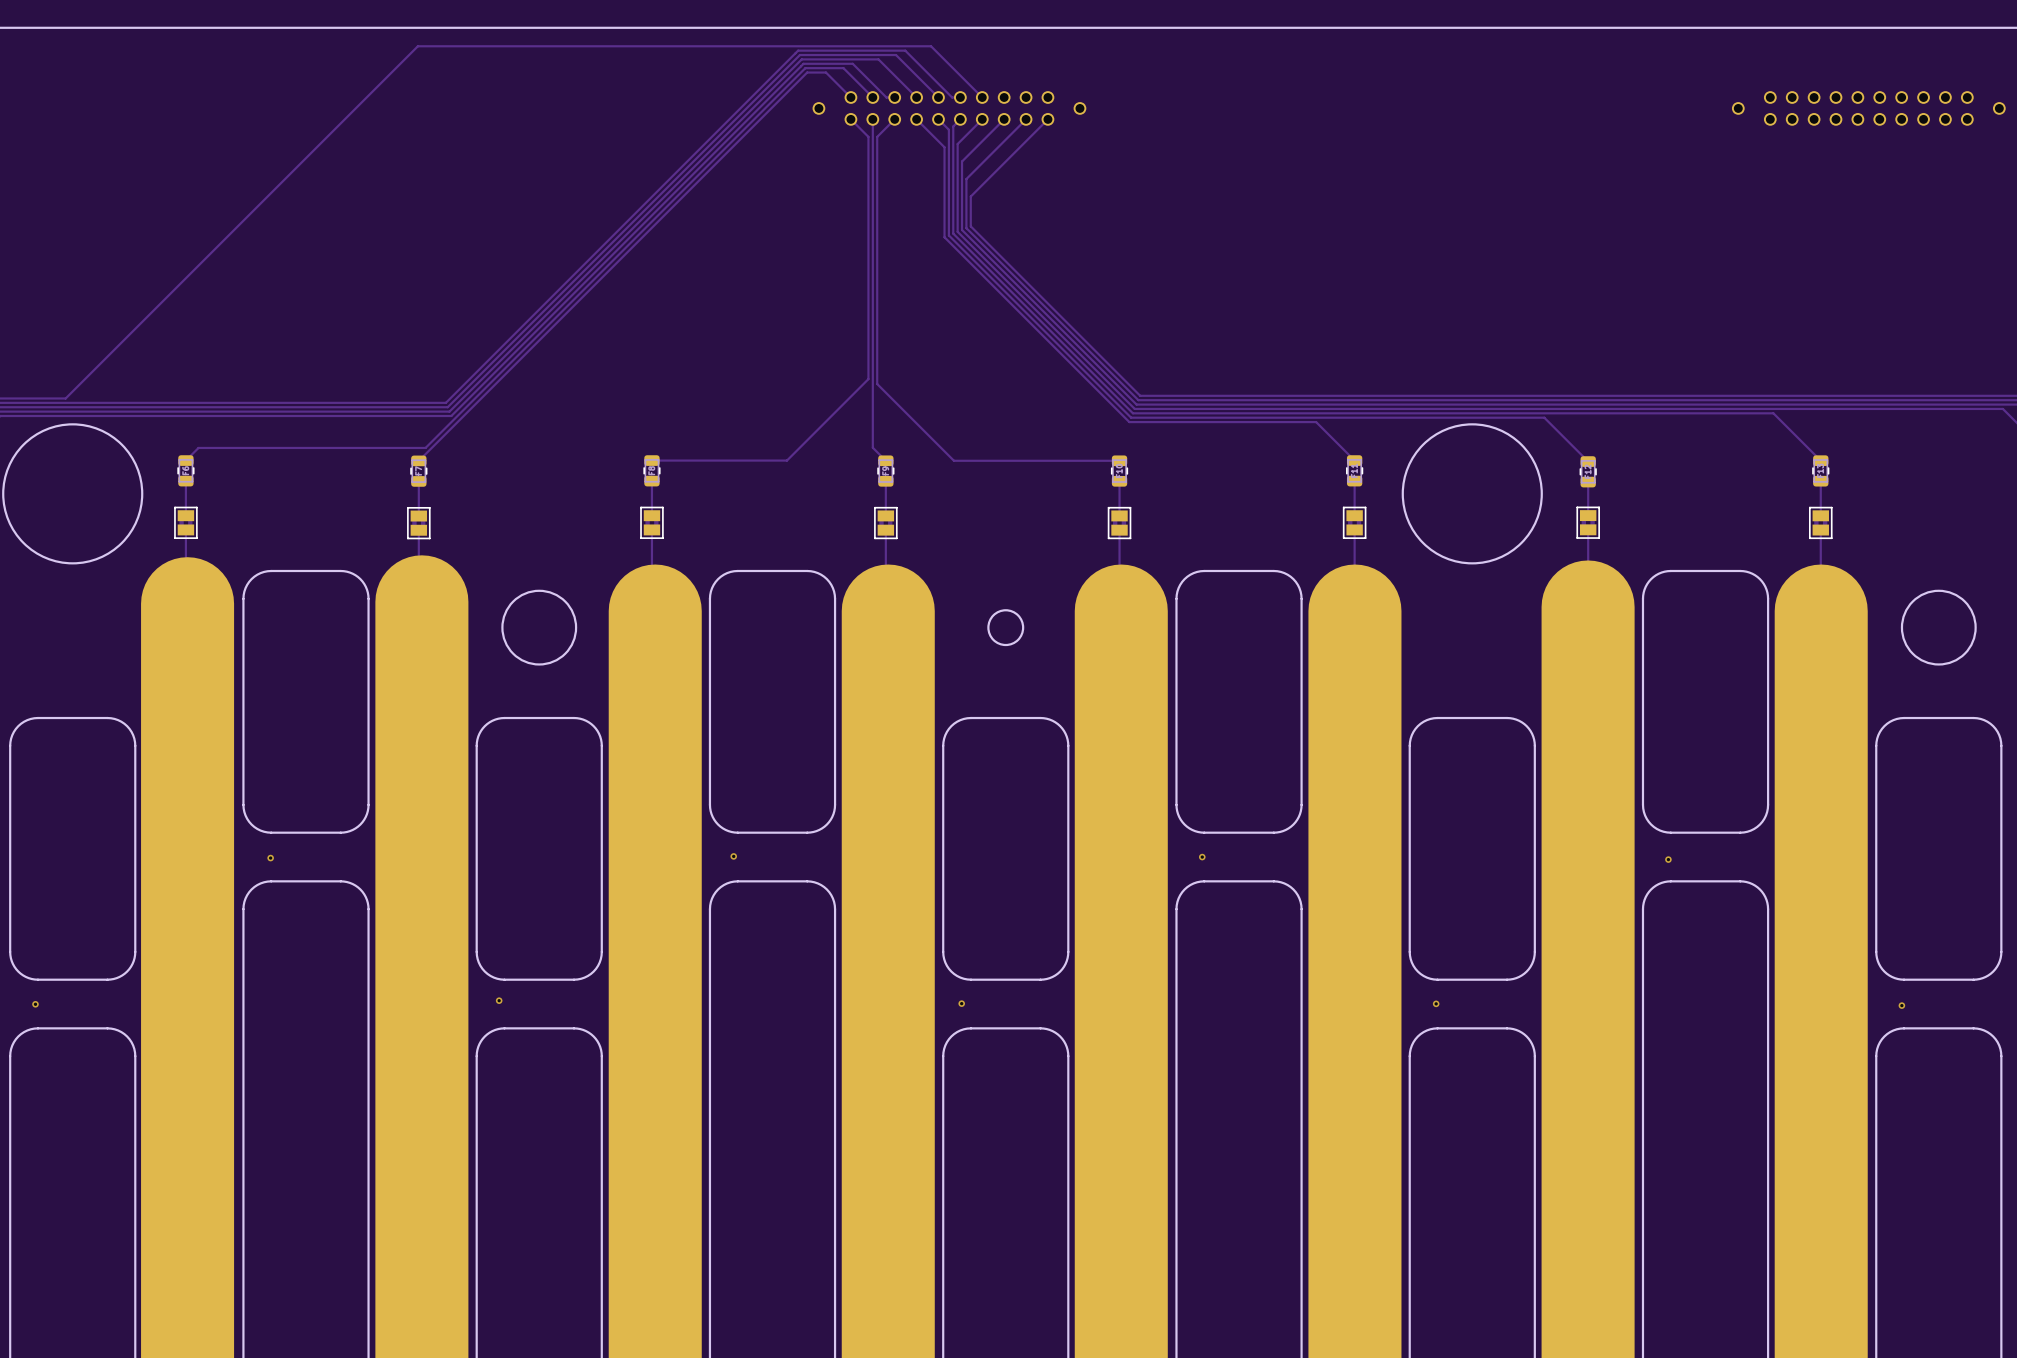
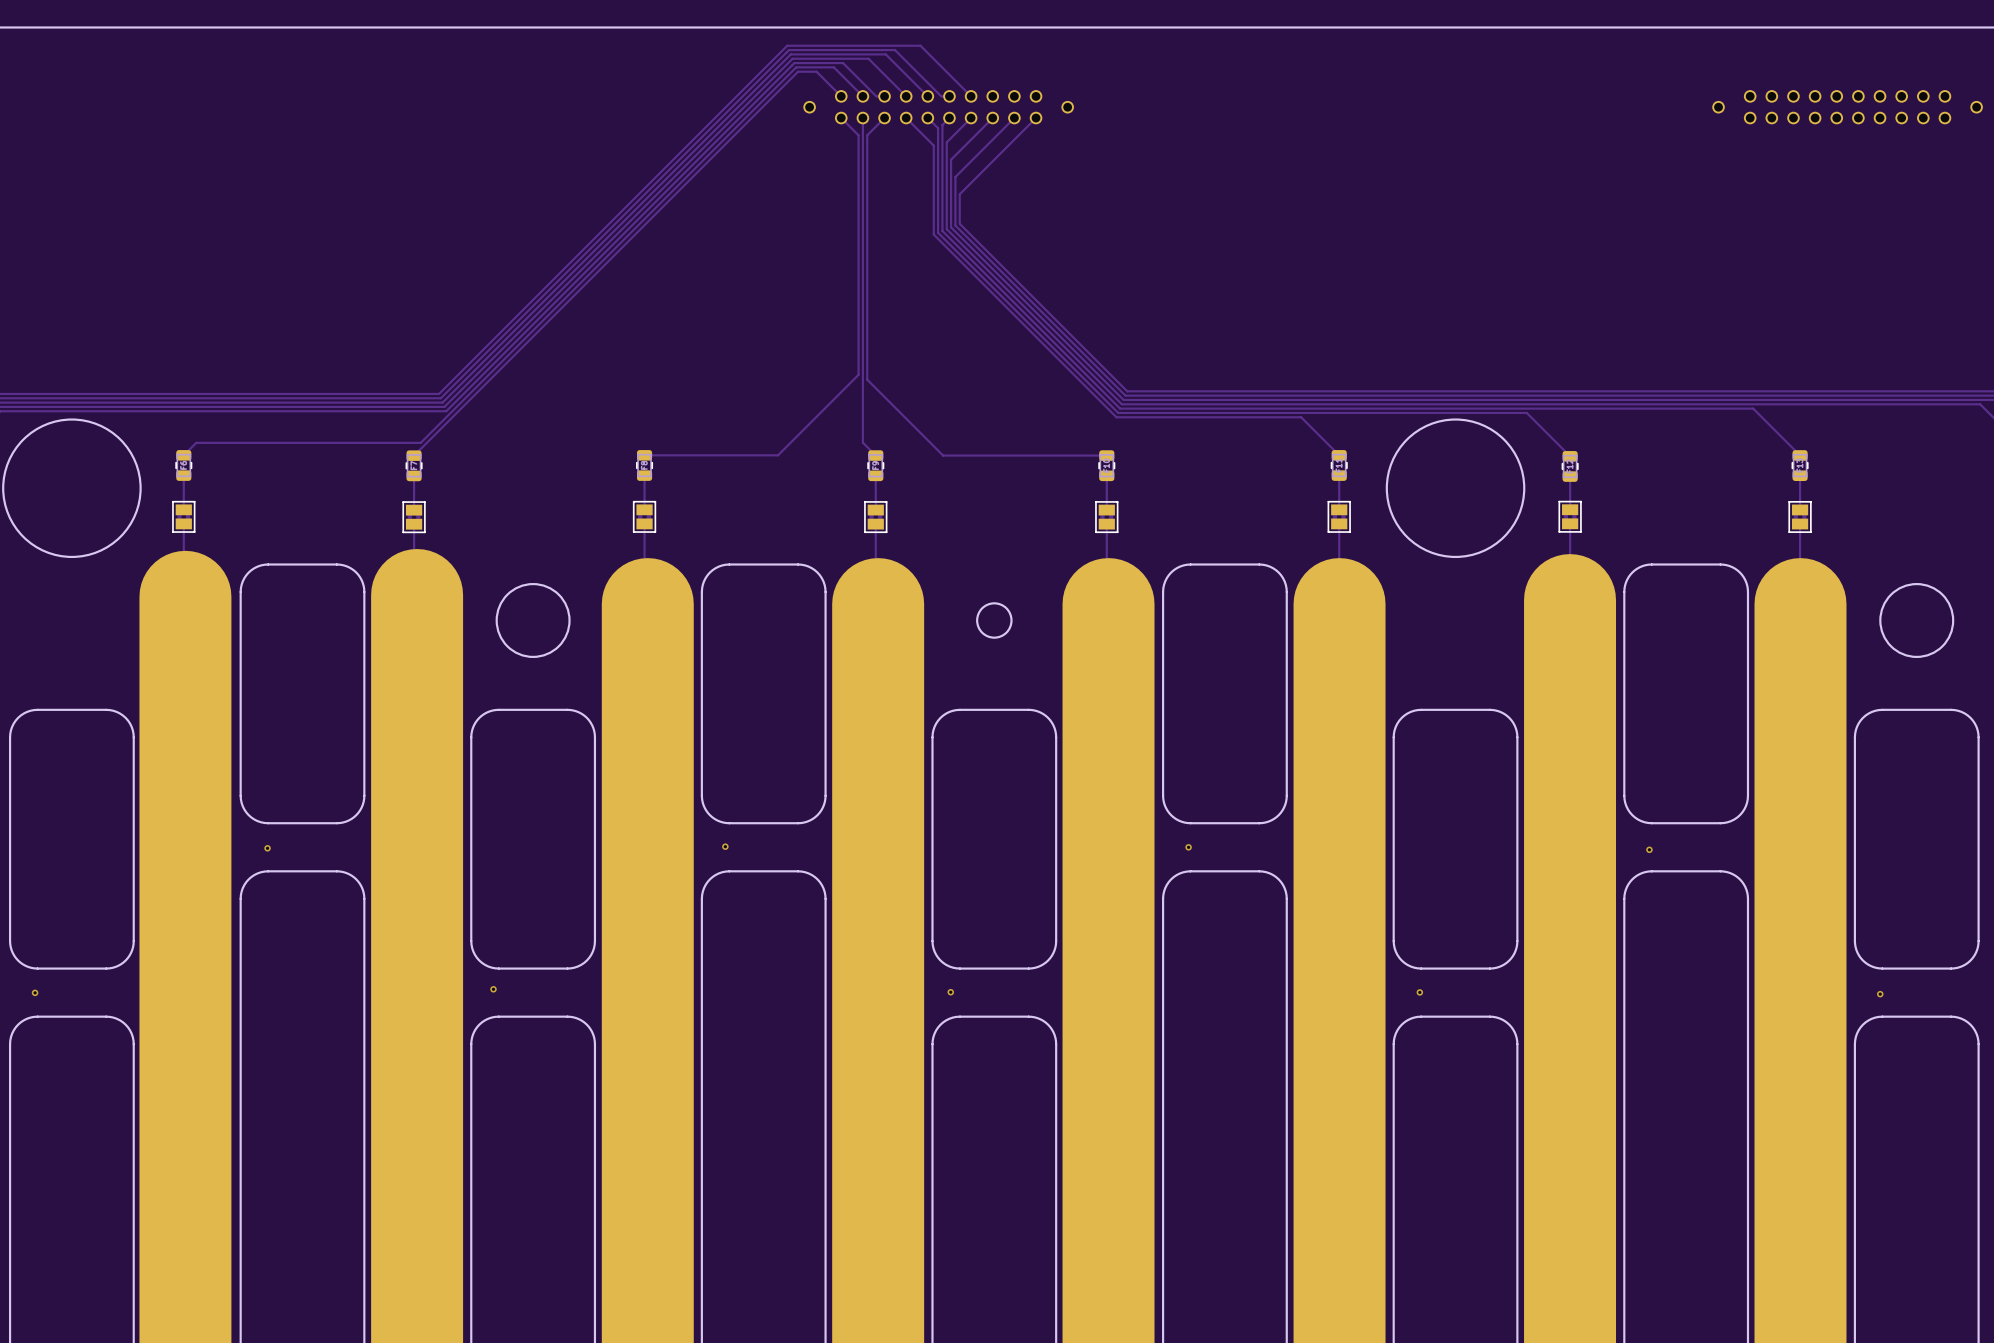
track: (796, 46) (417, 46) (65, 398) -> (787, 45) (439, 393) (64, 393)

